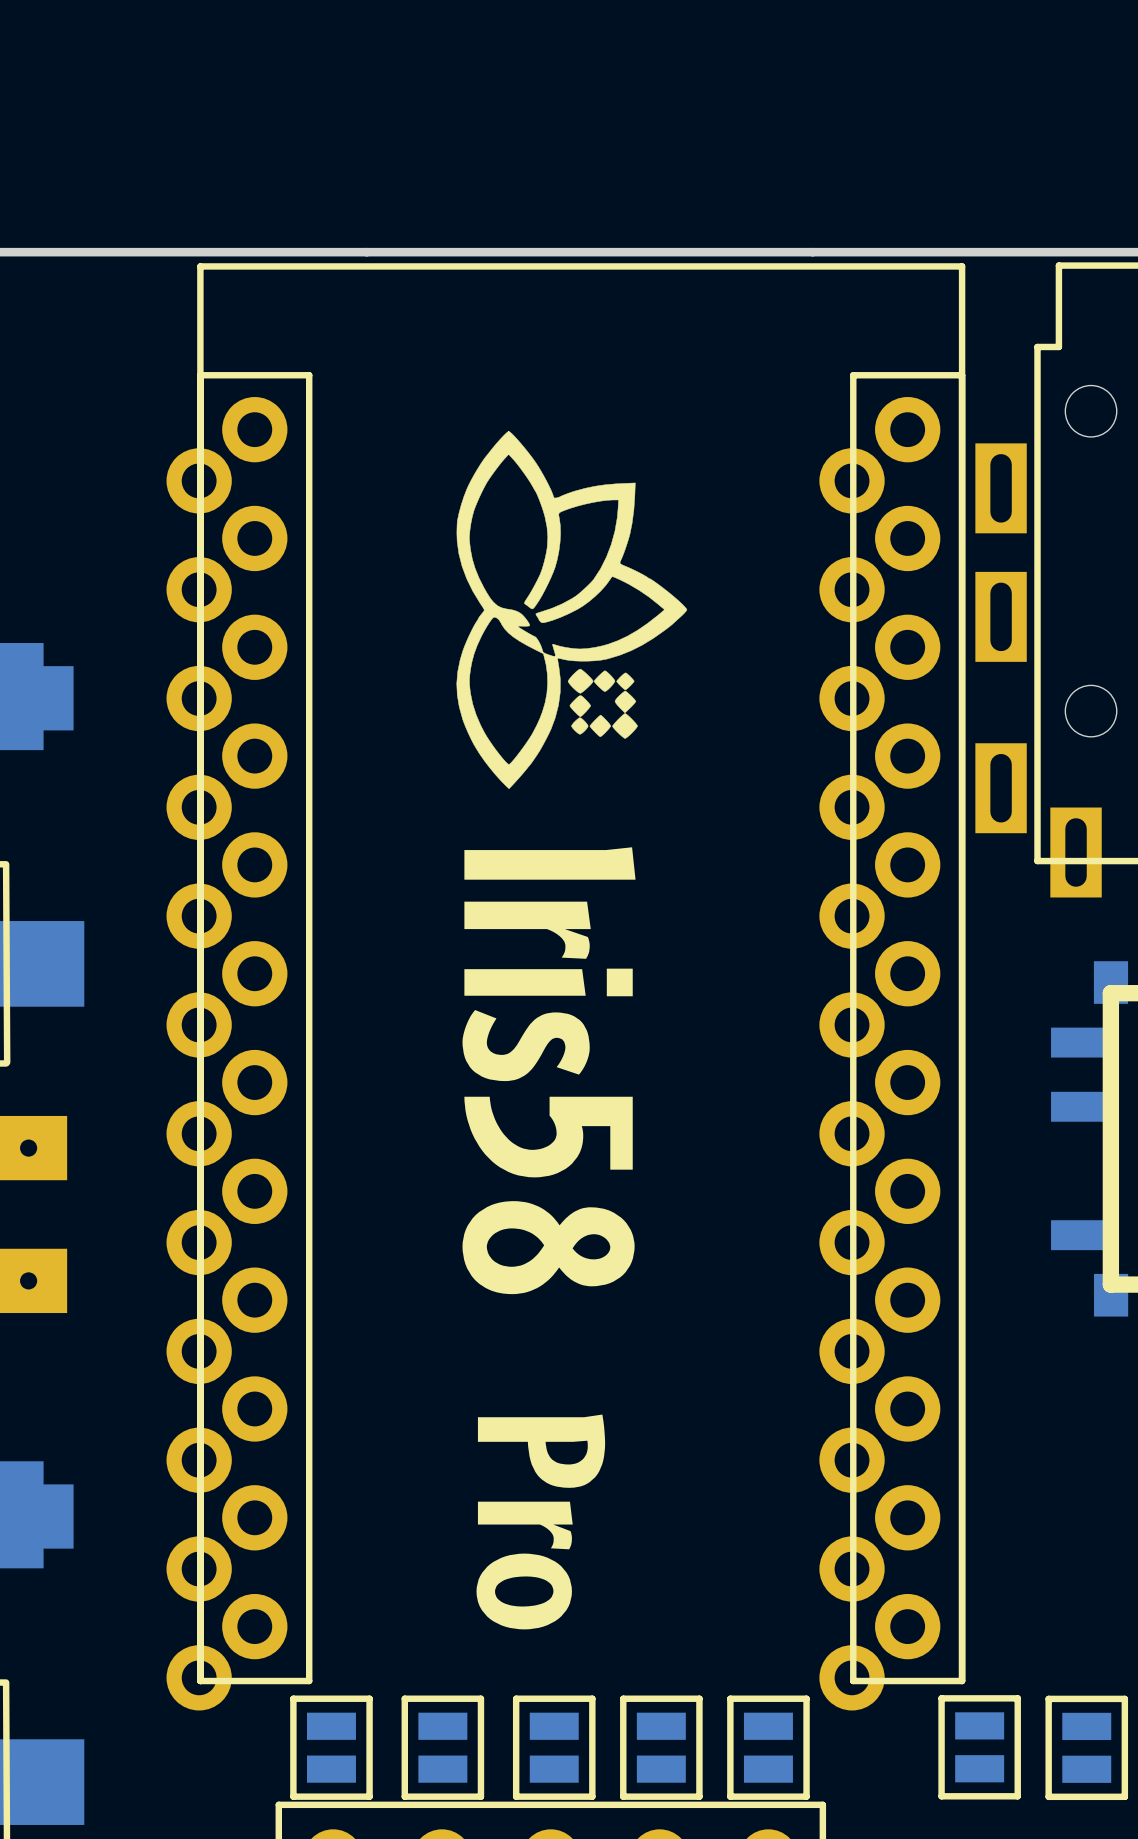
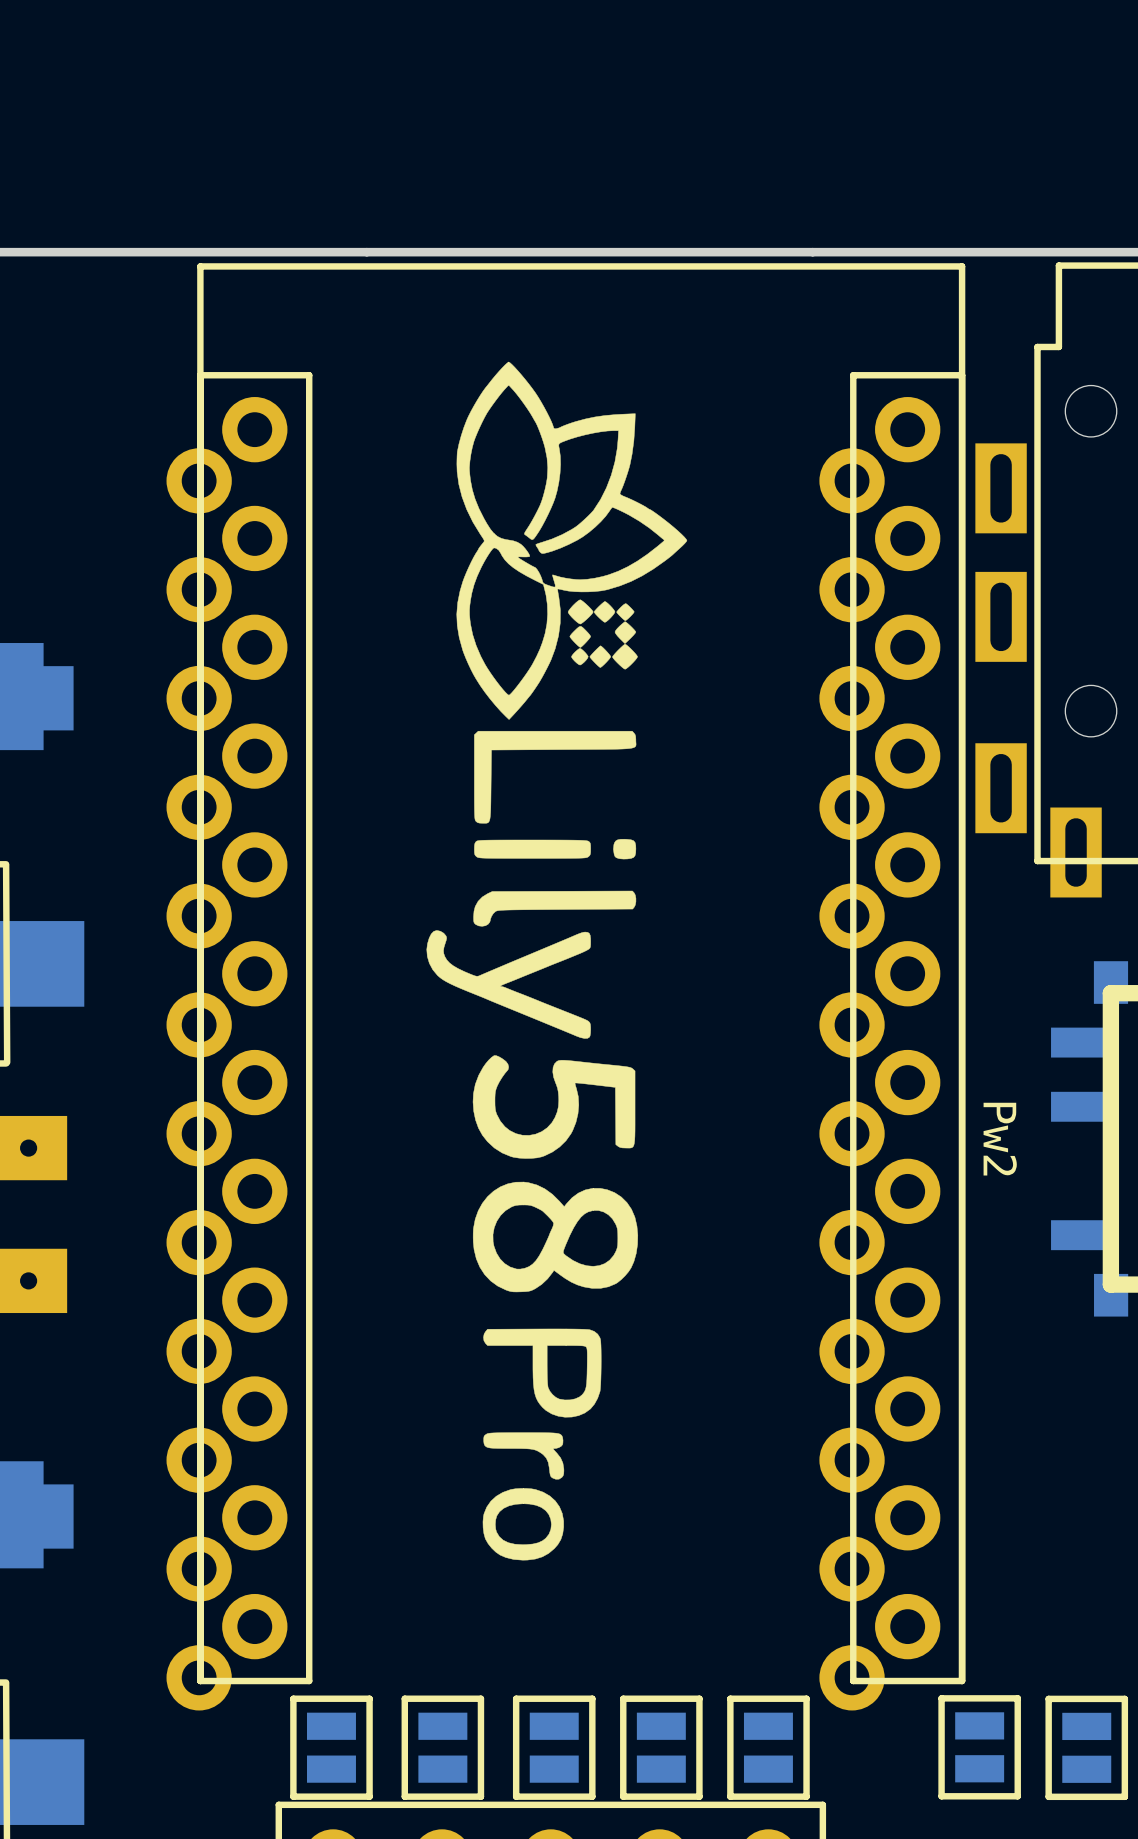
drawing: none -> [426, 361, 688, 1561]
drawing: [456, 431, 688, 790] -> none
Pw2 name: none -> Pw2 (1000, 1139)

